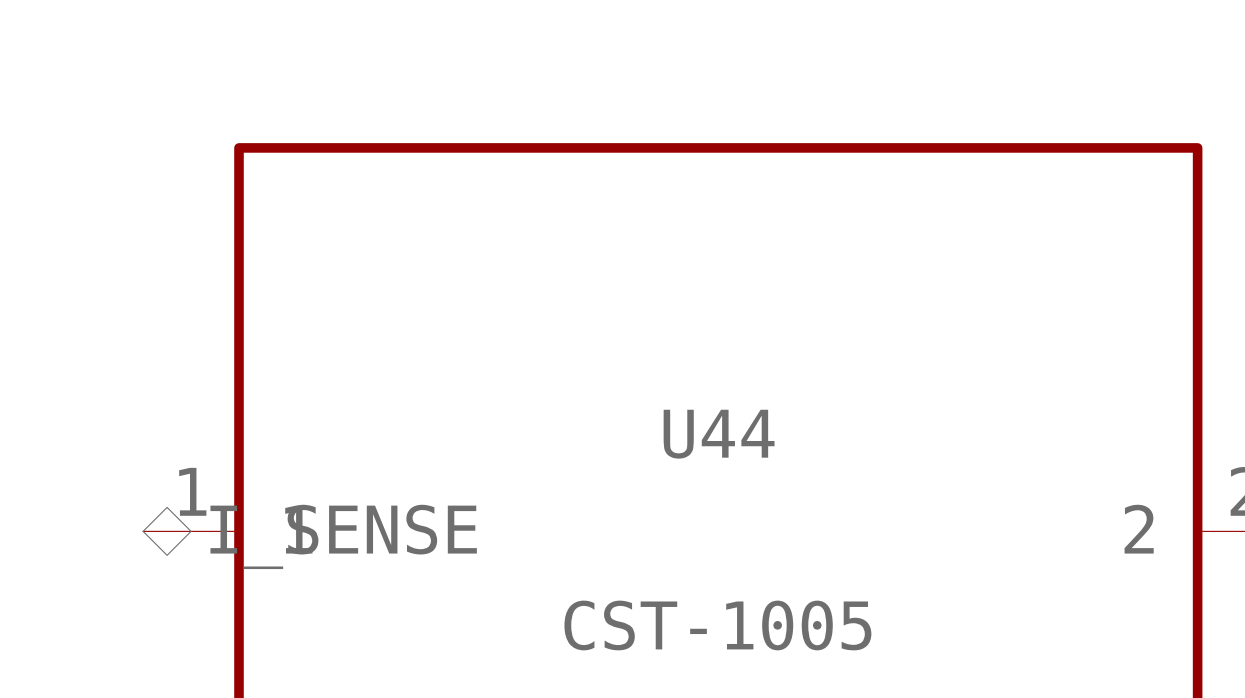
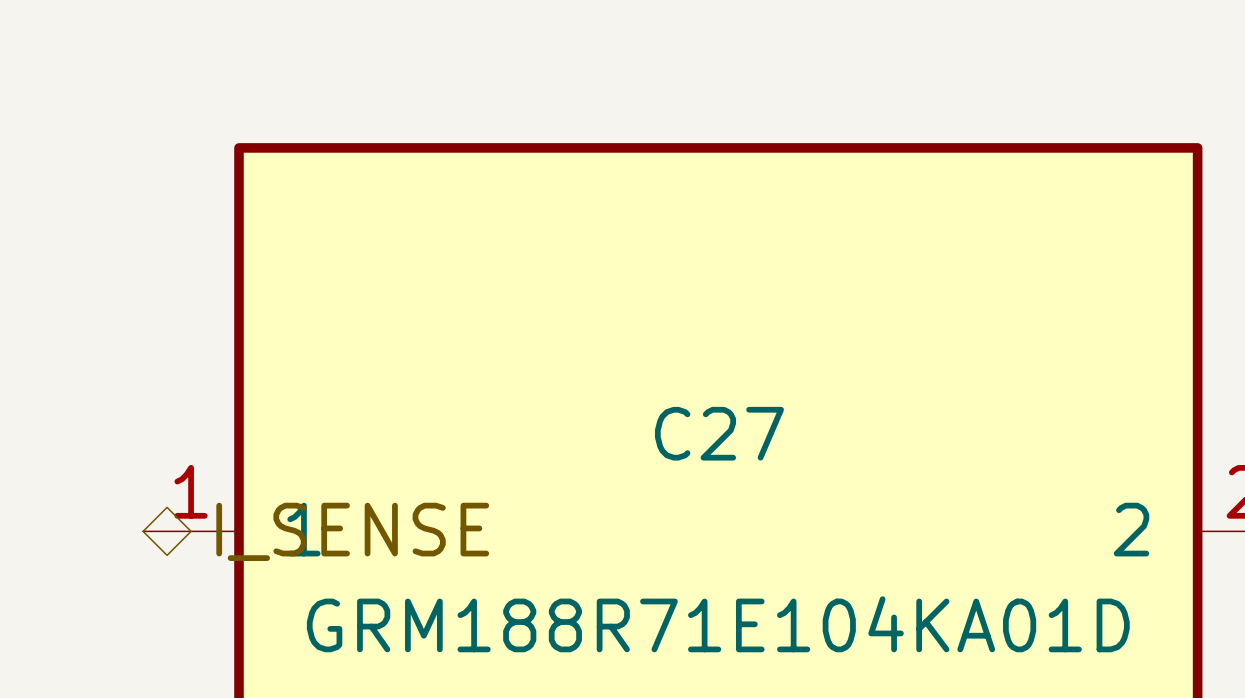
U44 name: U44 (719, 434) -> C27 (719, 433)
U44 value: CST-1005 (717, 625) -> GRM188R71E104KA01D (718, 624)

